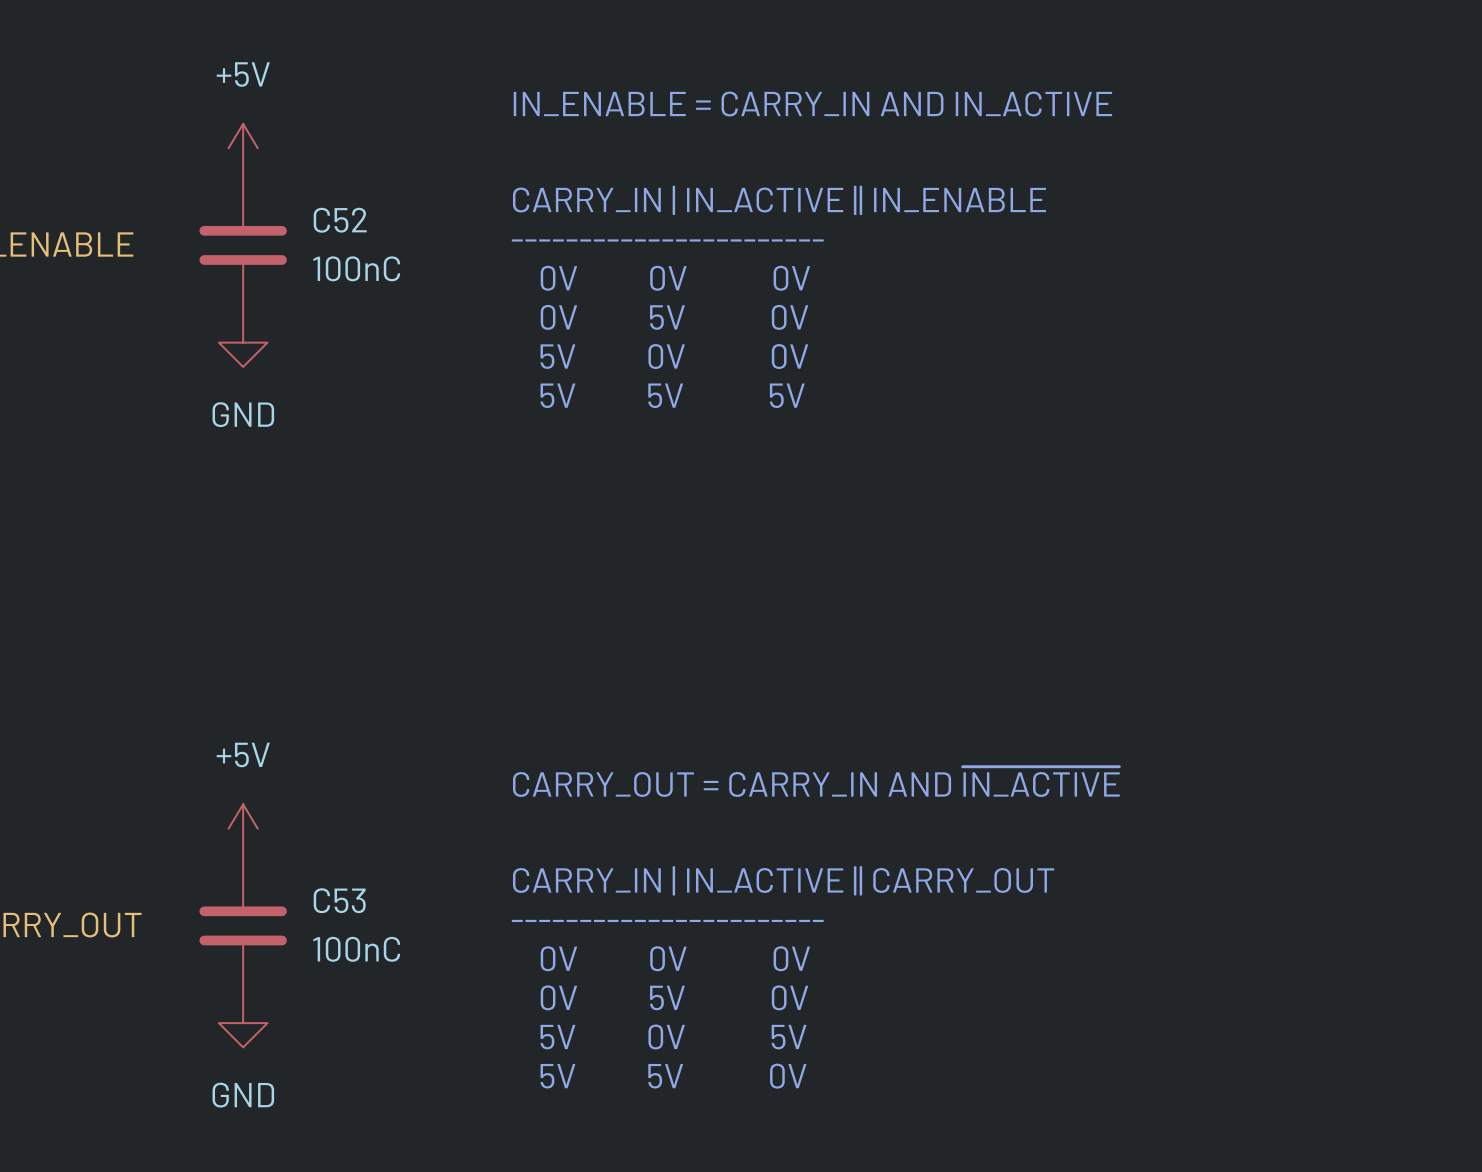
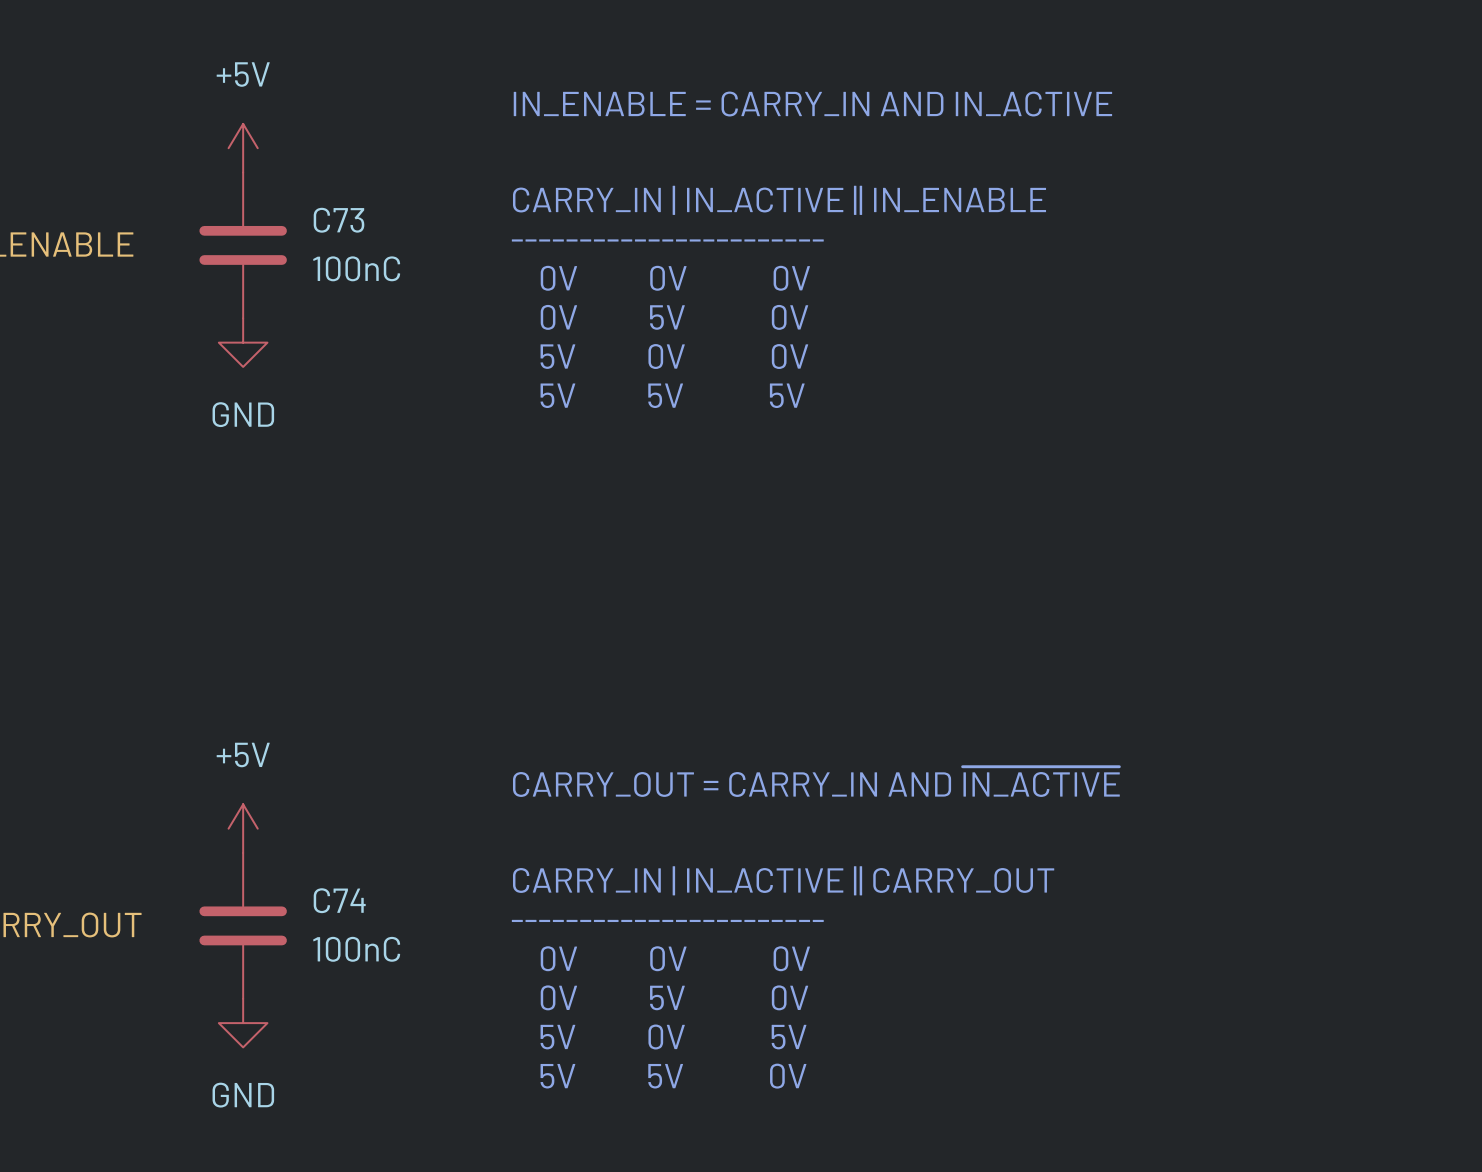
C52 name: C52 (340, 220) -> C73 (339, 220)
C53 name: C53 (339, 900) -> C74 (339, 900)

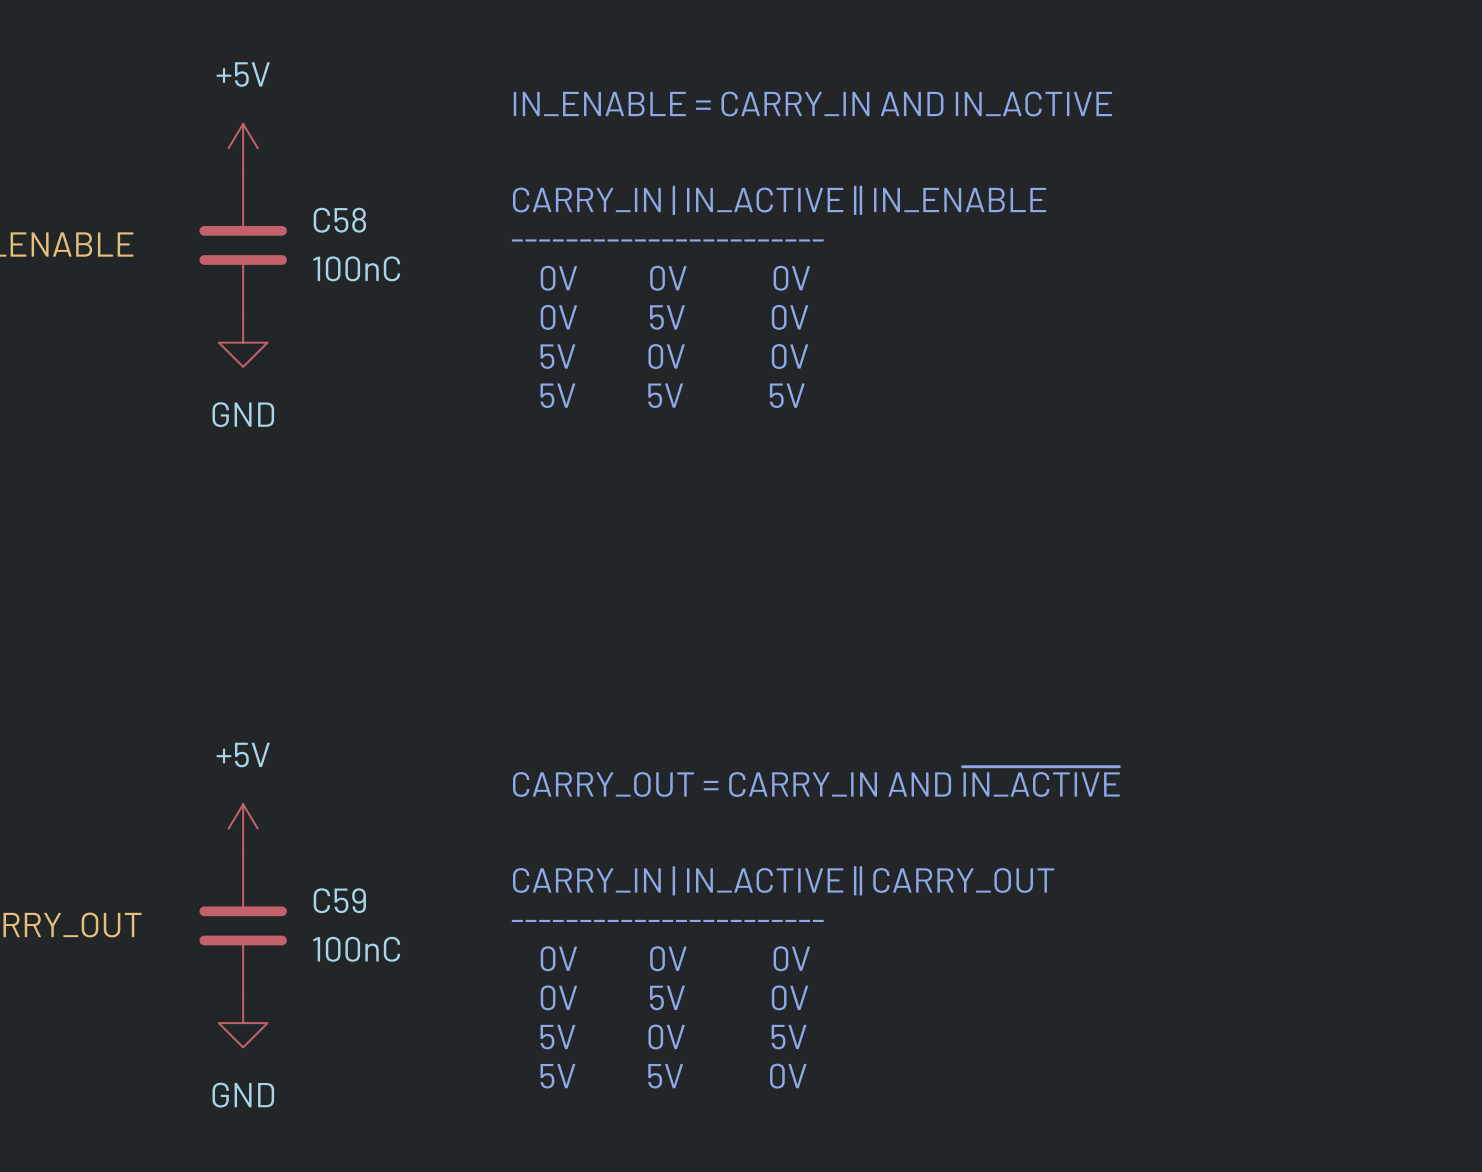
C73 name: C73 (339, 220) -> C58 (339, 220)
C74 name: C74 (339, 900) -> C59 (339, 900)

